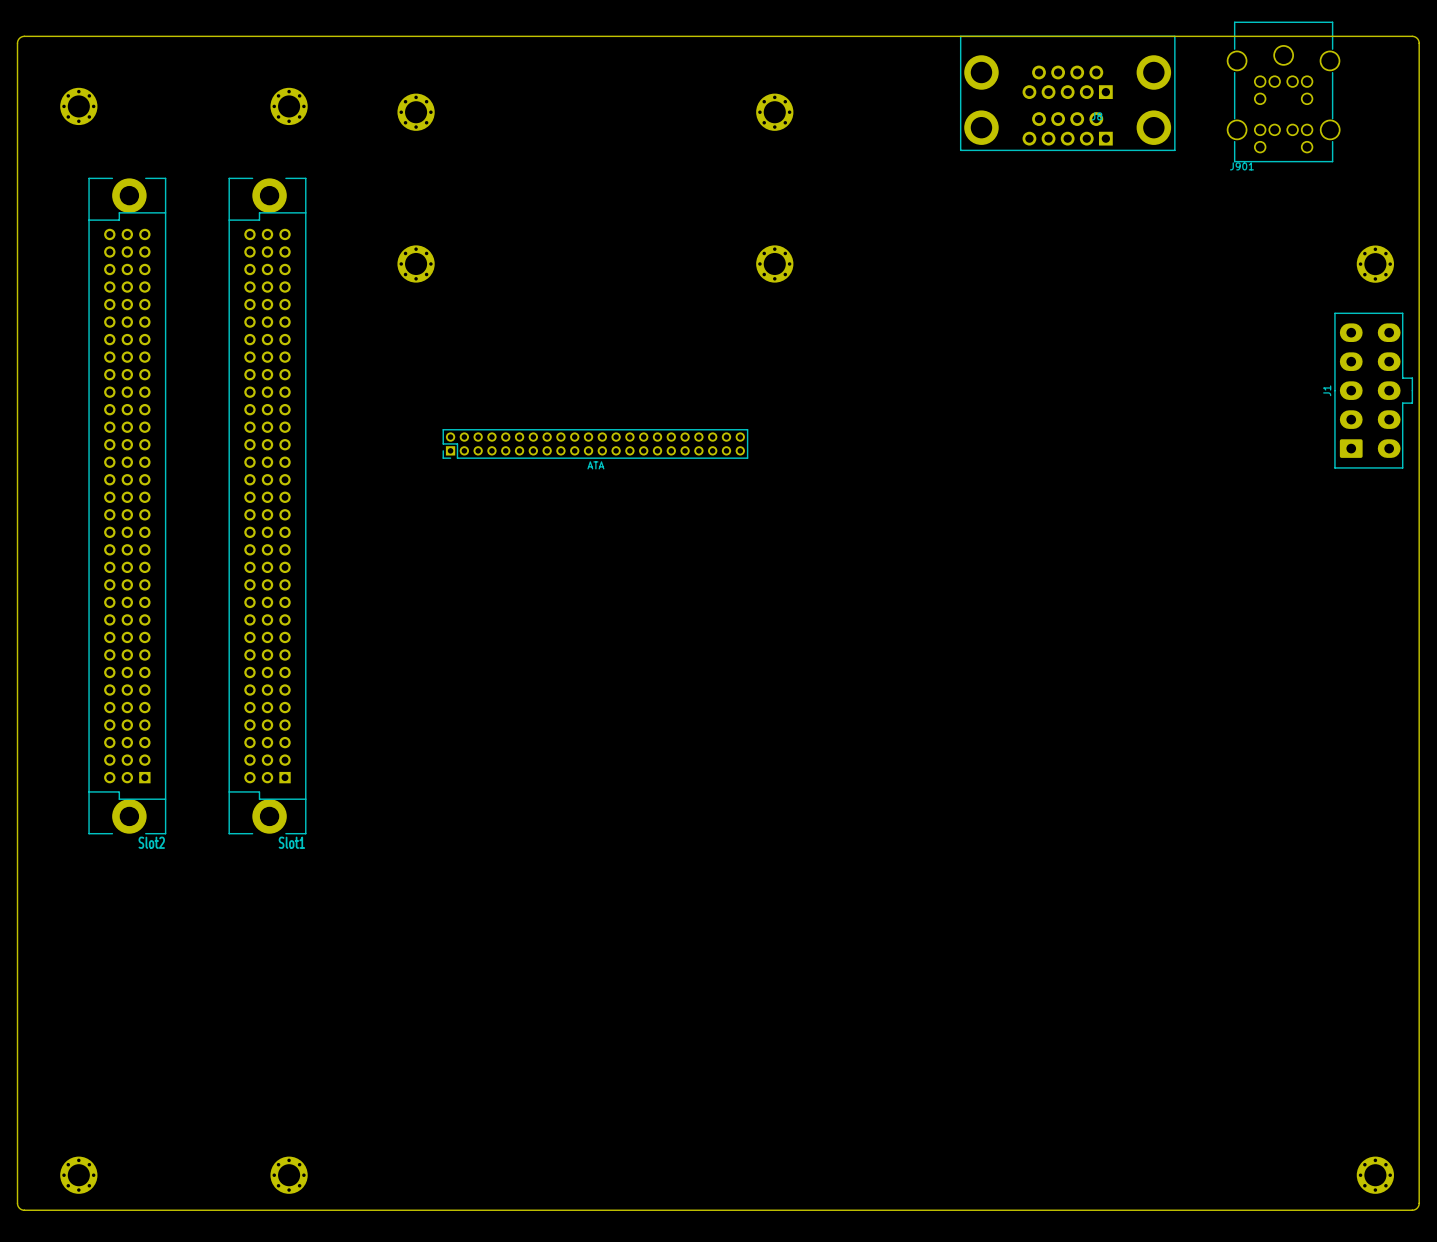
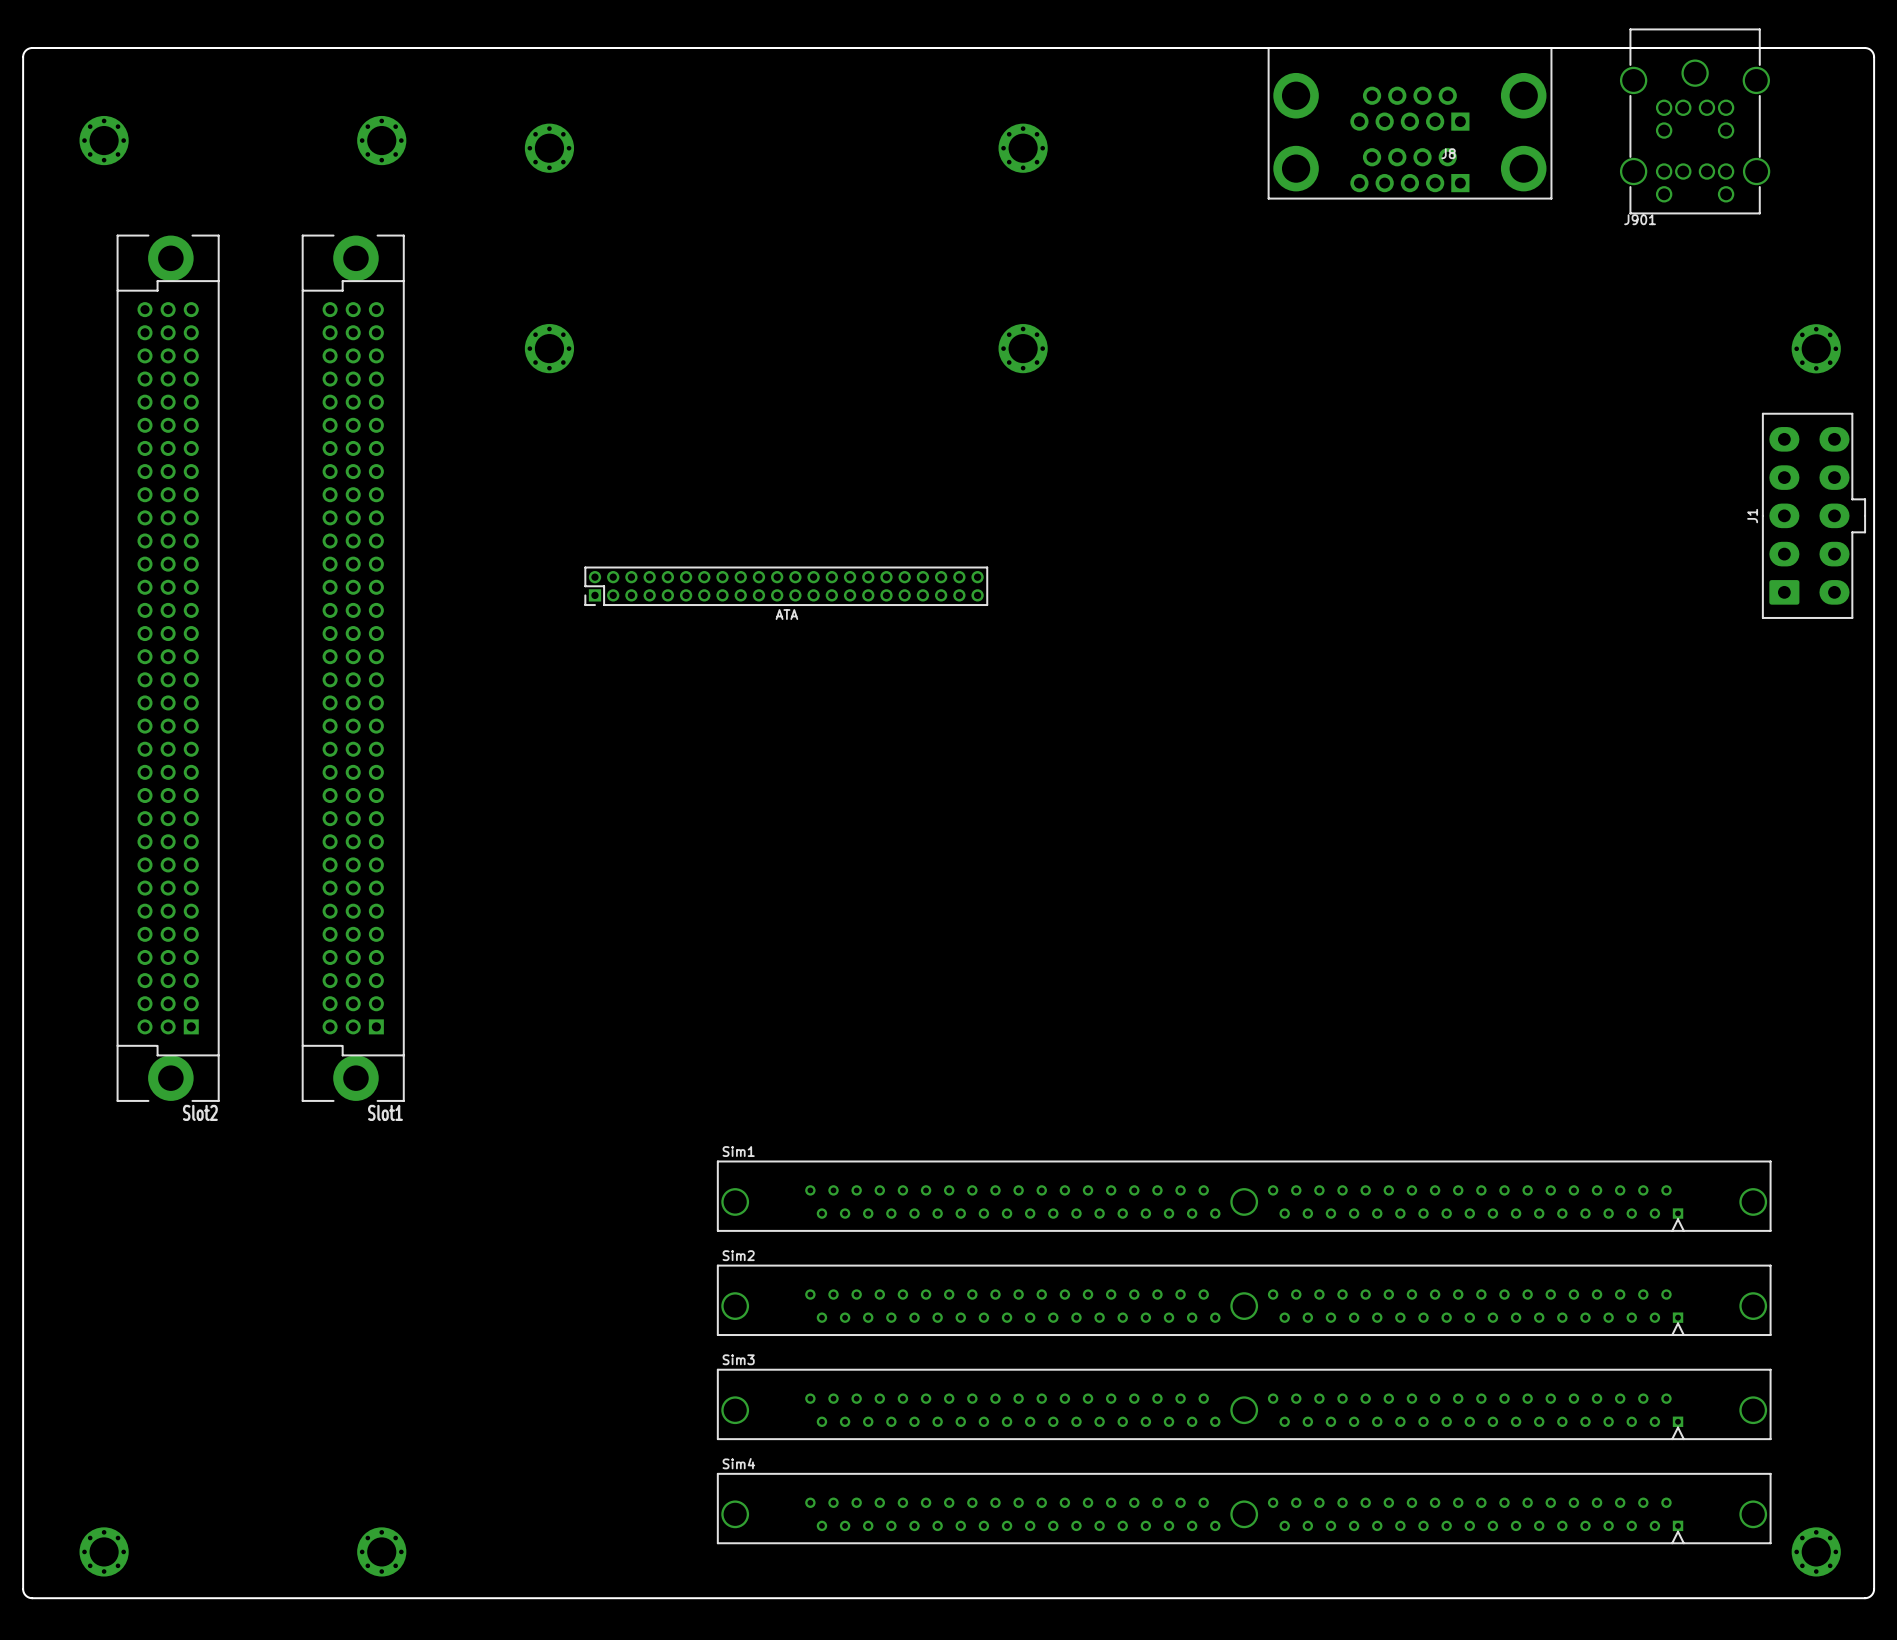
Sim1: none -> (1244, 1196)
Sim2: none -> (1244, 1300)
Sim3: none -> (1244, 1404)
Sim4: none -> (1244, 1508)

